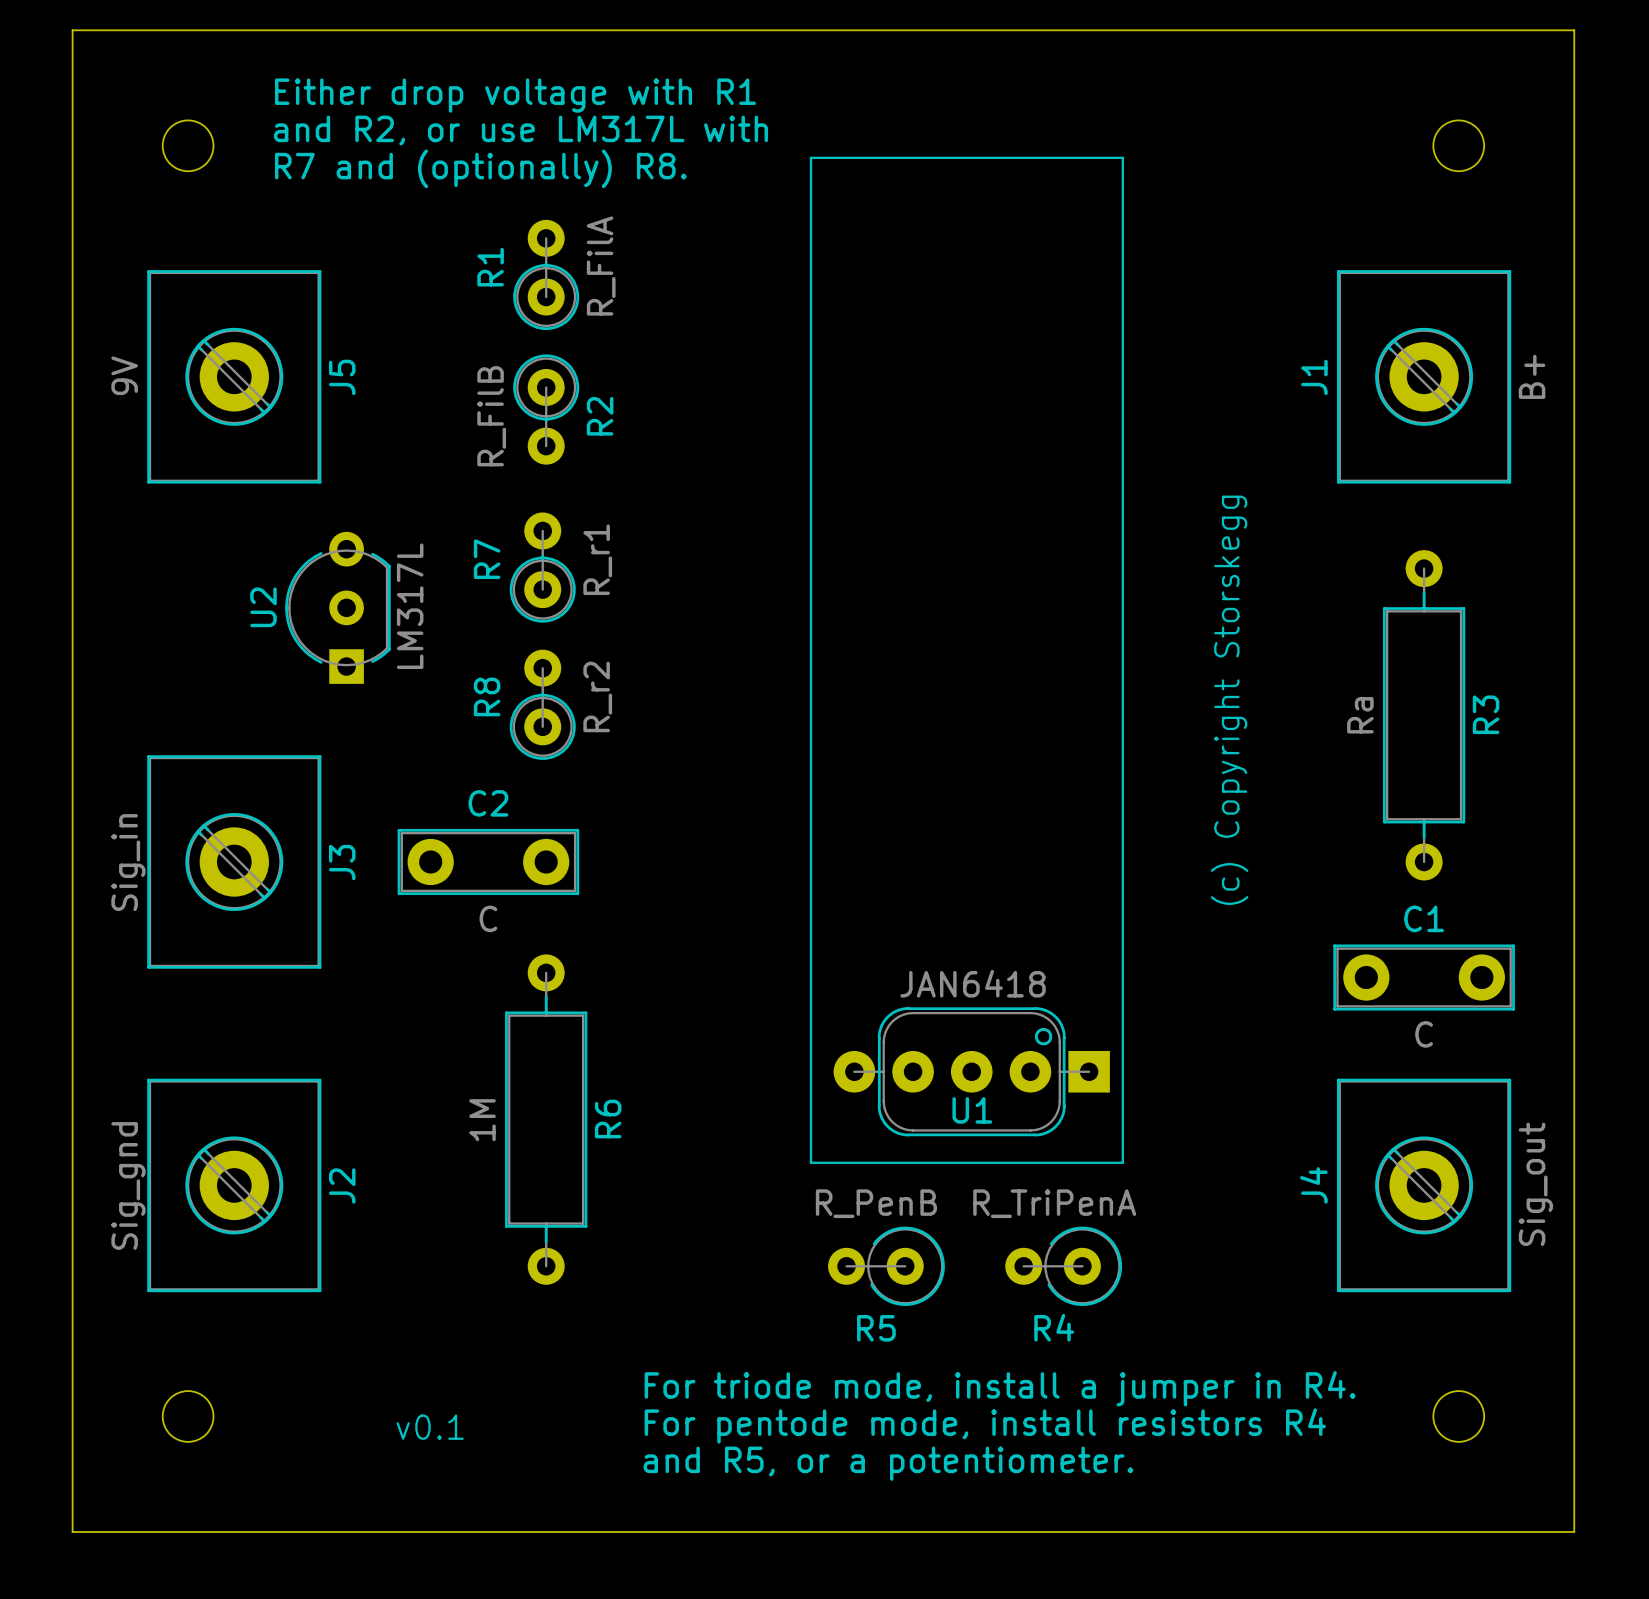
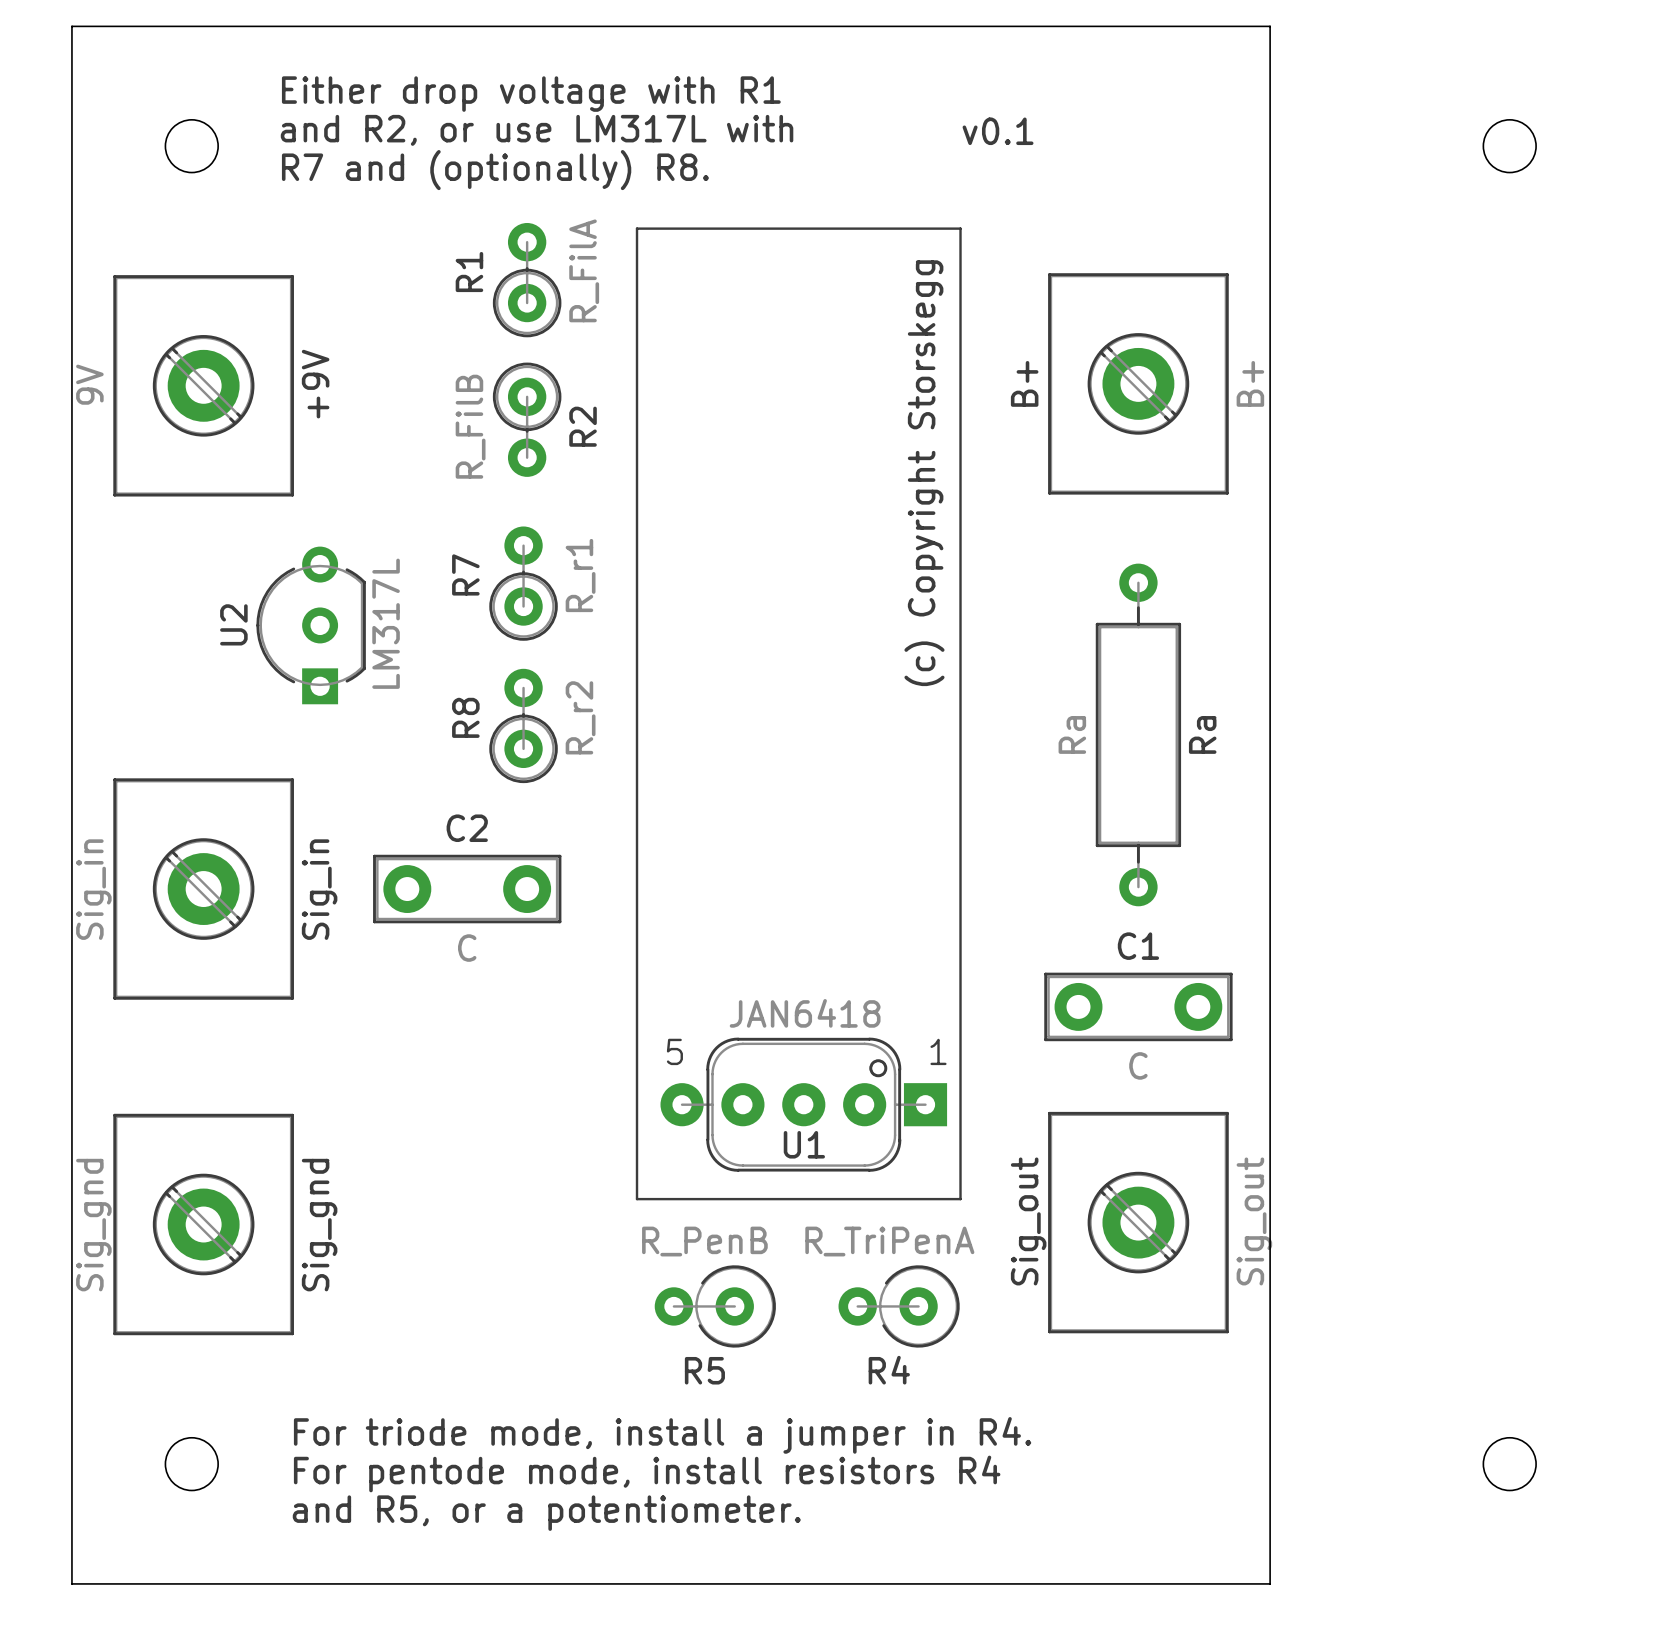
board edge: (1227, 30) (1574, 30) (1574, 1531) (1227, 1531) -> (1270, 26) (1270, 1583)
text: none -> v0.1 (998, 131)
line: (810, 157) (1122, 157) (1122, 1162) (810, 1162) (810, 157) -> none
line: none -> (637, 228) (960, 228) (960, 1199) (637, 1199) (637, 228)
R1 position: (546, 274) -> (527, 280)
B+: none -> B+ (1138, 383)
+9V: none -> 9V (203, 385)
J5: 9V (234, 376) -> none
J1: B+ (1424, 376) -> none
R2 position: (546, 409) -> (527, 419)
R7 position: (542, 567) -> (523, 583)
U2 position: (337, 607) -> (311, 625)
text position: (c) Copyright Storskegg (1229, 700) -> (c) Copyright Storskegg (924, 473)
R8 position: (542, 704) -> (523, 725)
Ra: none -> Ra (1138, 734)
R3: Ra (1424, 715) -> none
Sig_in: none -> Sig_in (203, 889)
J3: Sig_in (234, 862) -> none
C2 position: (488, 862) -> (467, 889)
C1 position: (1424, 977) -> (1138, 1006)
text: none -> 5 (674, 1051)
text: none -> 1 (938, 1051)
U1 position: (971, 1071) -> (803, 1104)
R6: 1M (546, 1119) -> none
Sig_out: none -> Sig_out (1138, 1222)
Sig_gnd: none -> Sig_gnd (203, 1224)
J2: Sig_gnd (234, 1185) -> none
J4: Sig_out (1424, 1185) -> none
R5 position: (886, 1266) -> (715, 1306)
R4 position: (1063, 1266) -> (899, 1306)
text position: For triode mode, install a jumper in R4. (1000, 1388) -> For triode mode, install a jumper in R4. (662, 1435)
text position: For pentode mode, install resistors R4 (985, 1425) -> For pentode mode, install resistors R4 (647, 1473)
text: v0.1 (430, 1427) -> none
text position: and R5, or a potentiometer. (888, 1463) -> and R5, or a potentiometer. (546, 1513)

